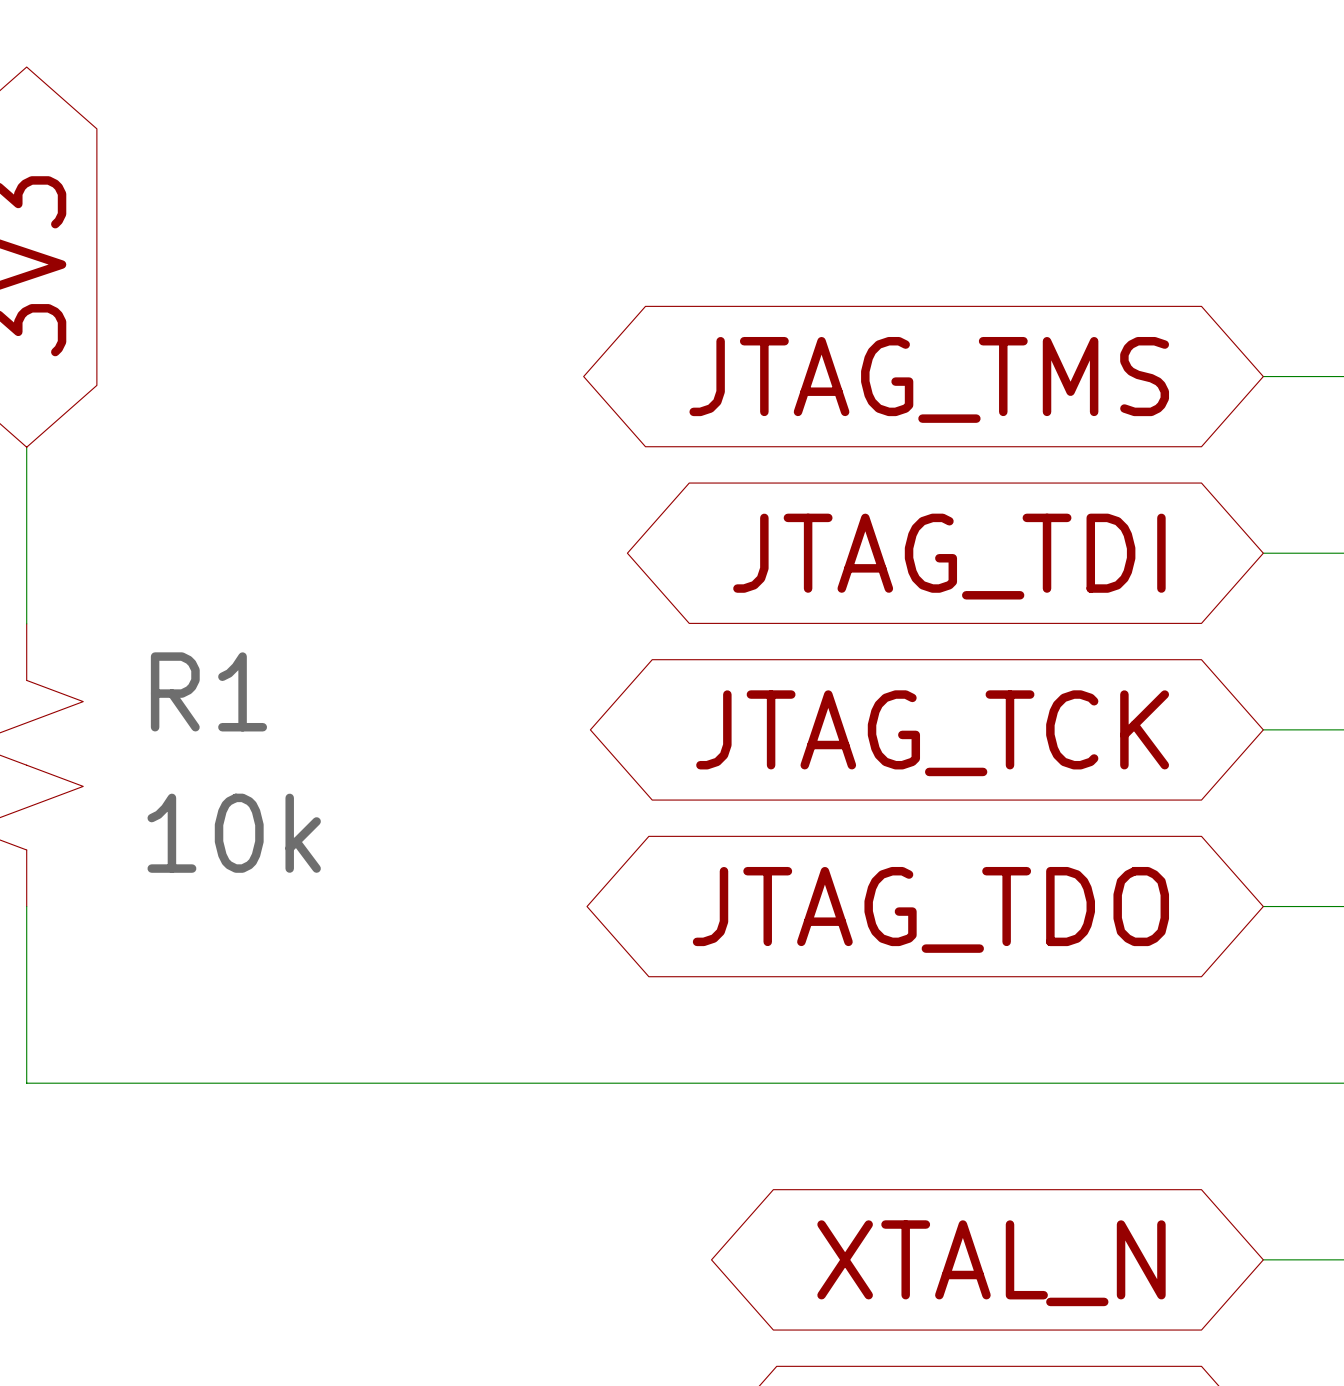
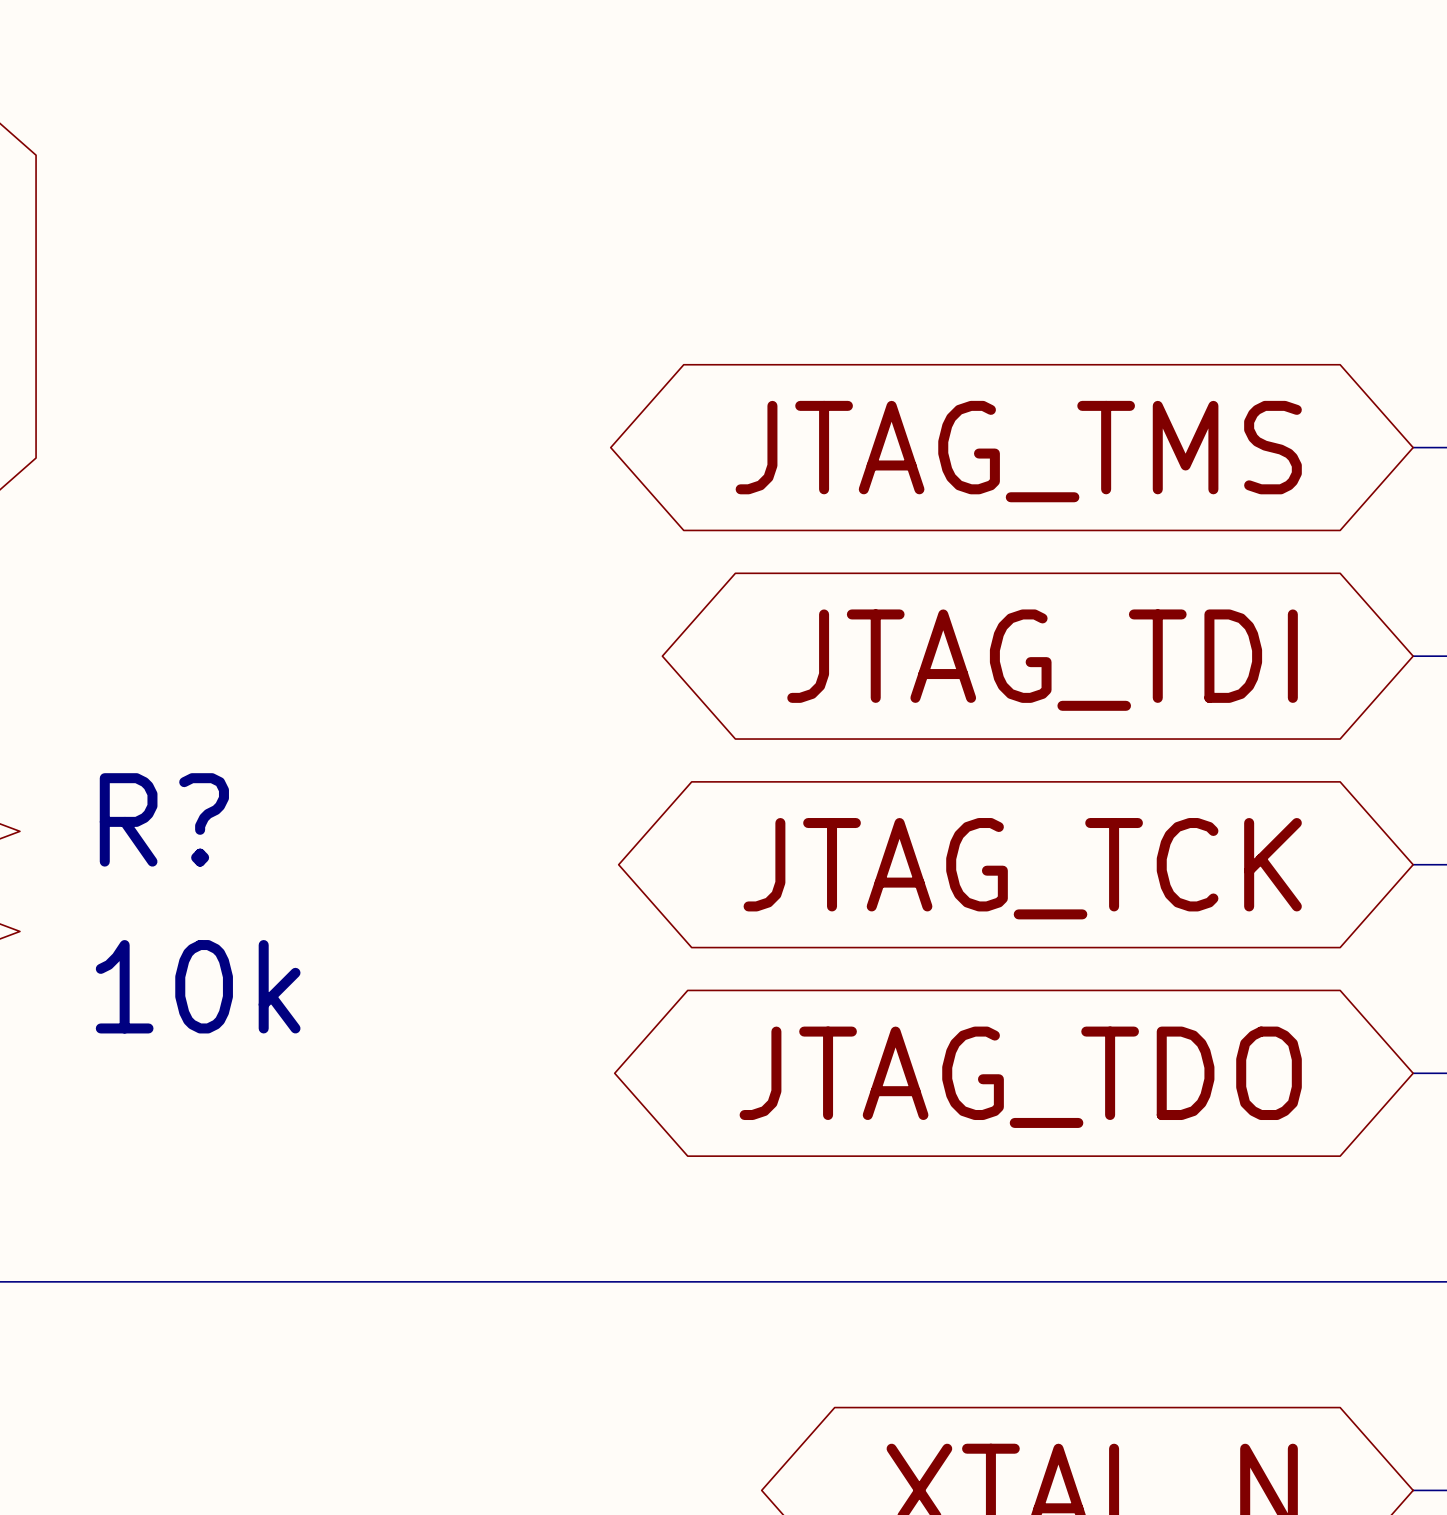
R1 name: R1 (208, 691) -> R? (164, 819)

